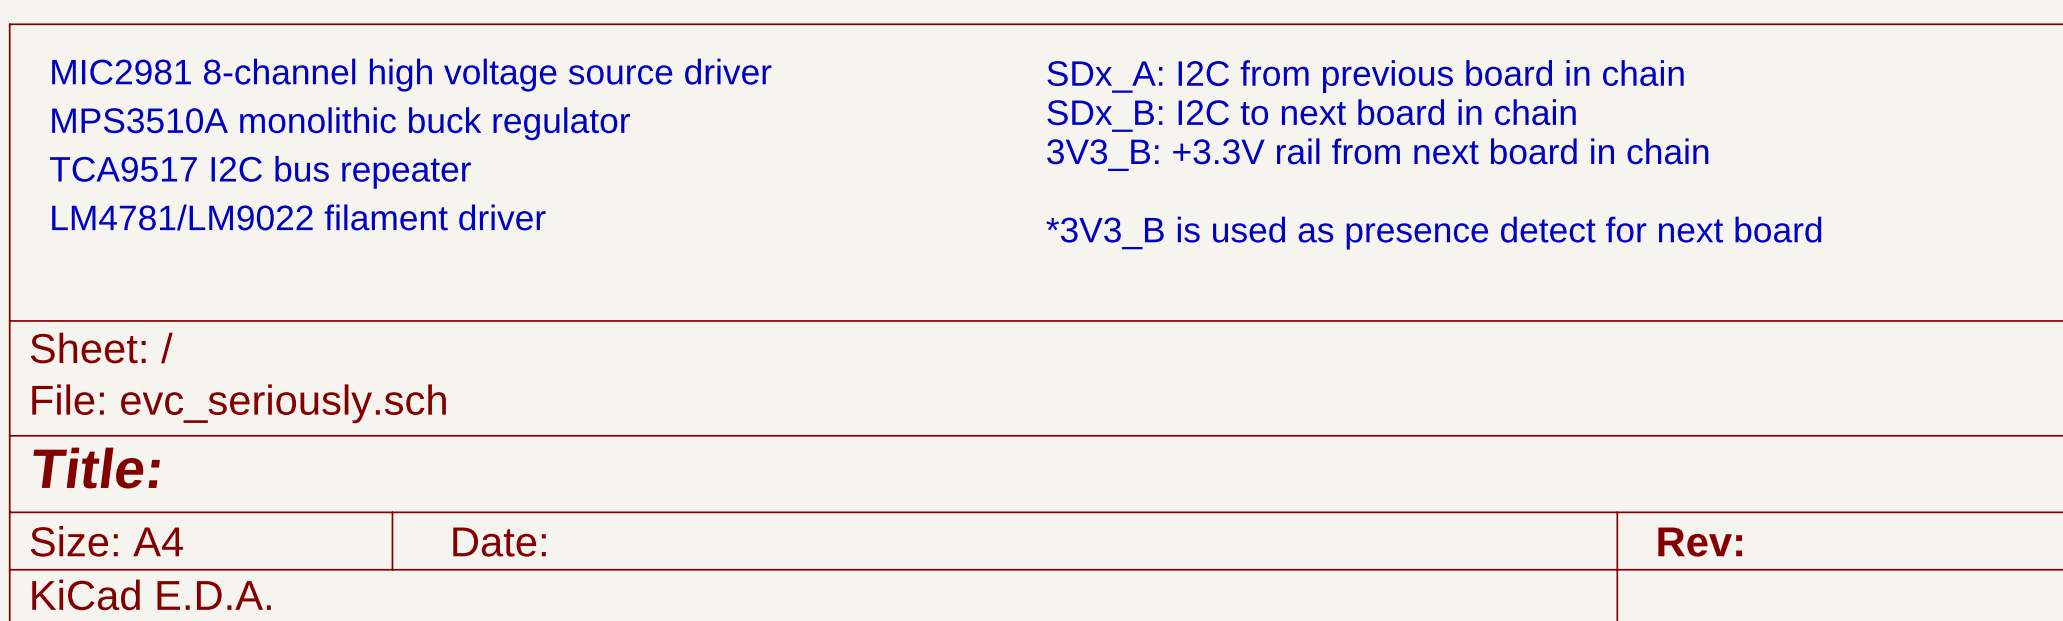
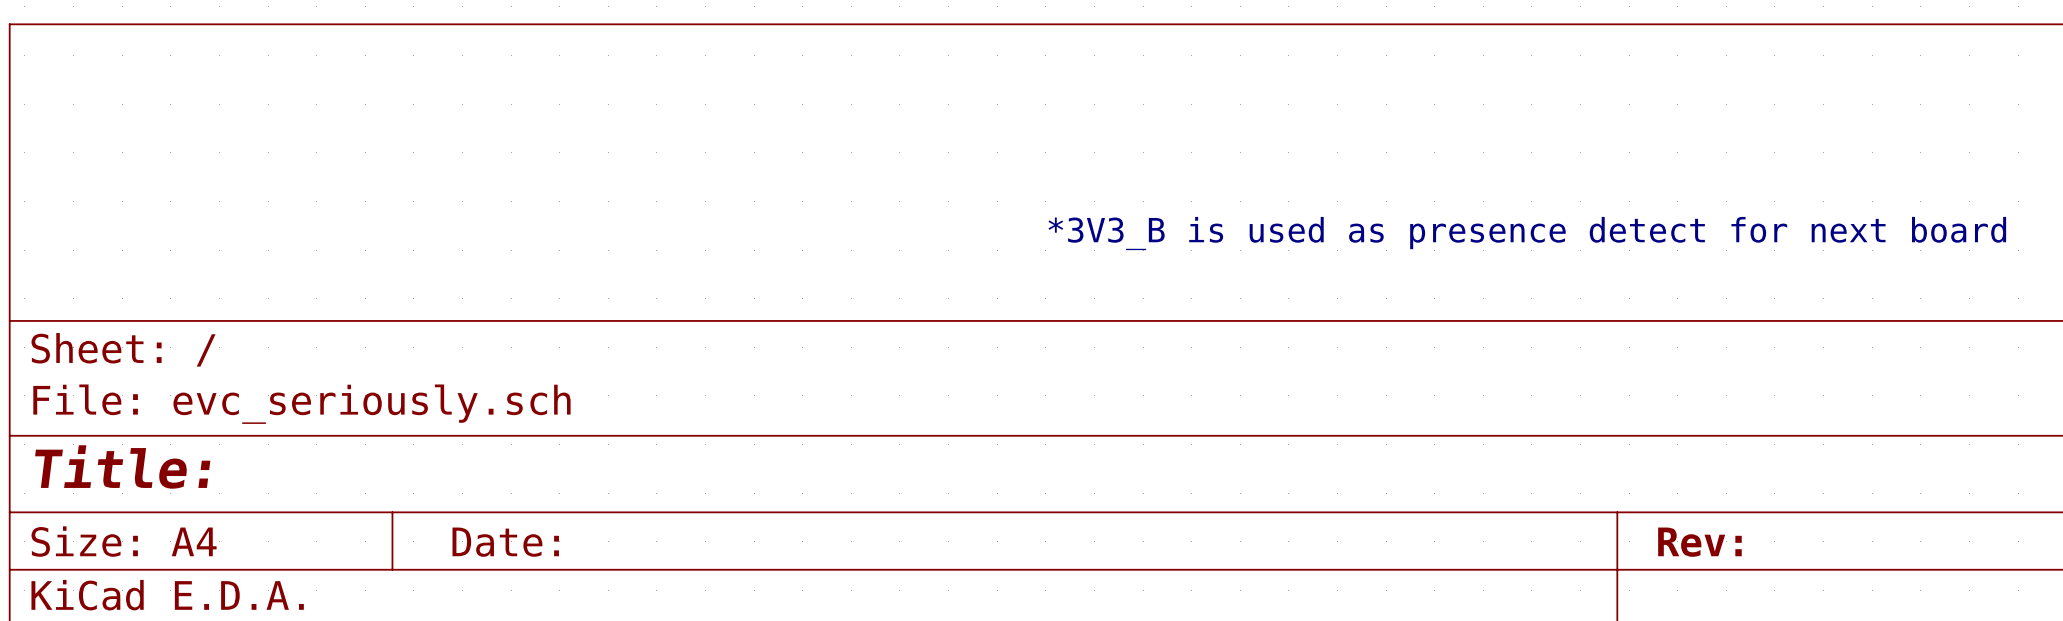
text: MIC2981 8-channel high voltage source driver (411, 75) -> none
text: SDx_A: I2C from previous board in chain (1365, 76) -> none
text: SDx_B: I2C to next board in chain (1311, 115) -> none
text: MPS3510A monolithic buck regulator (341, 123) -> none
text: 3V3_B: +3.3V rail from next board in chain (1377, 154) -> none
text: TCA9517 I2C bus repeater (260, 172) -> none
text: LM4781/LM9022 filament driver (298, 217) -> none

